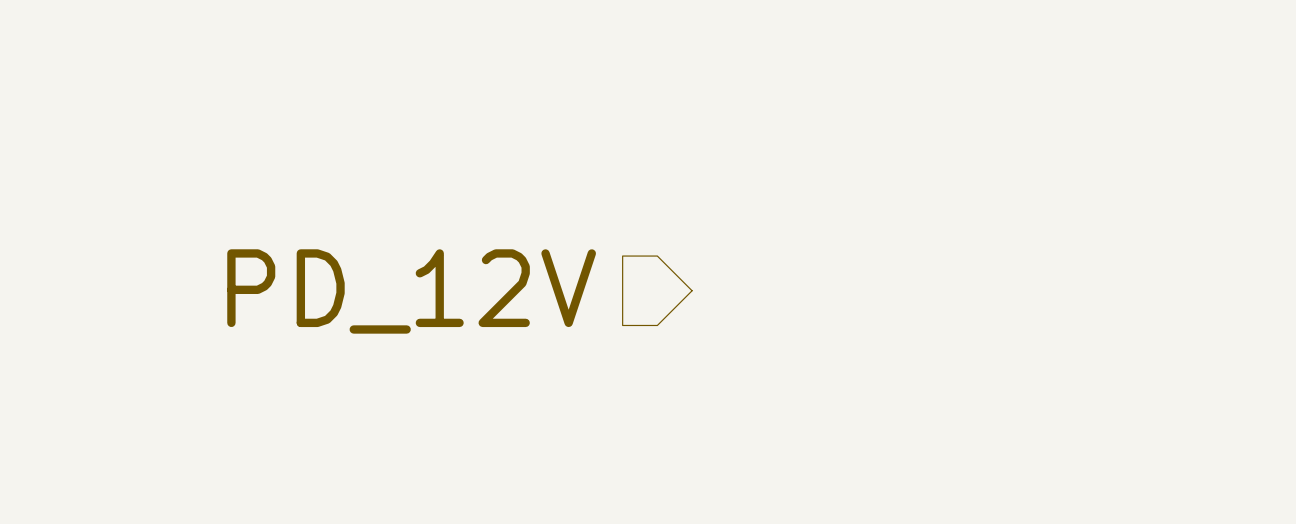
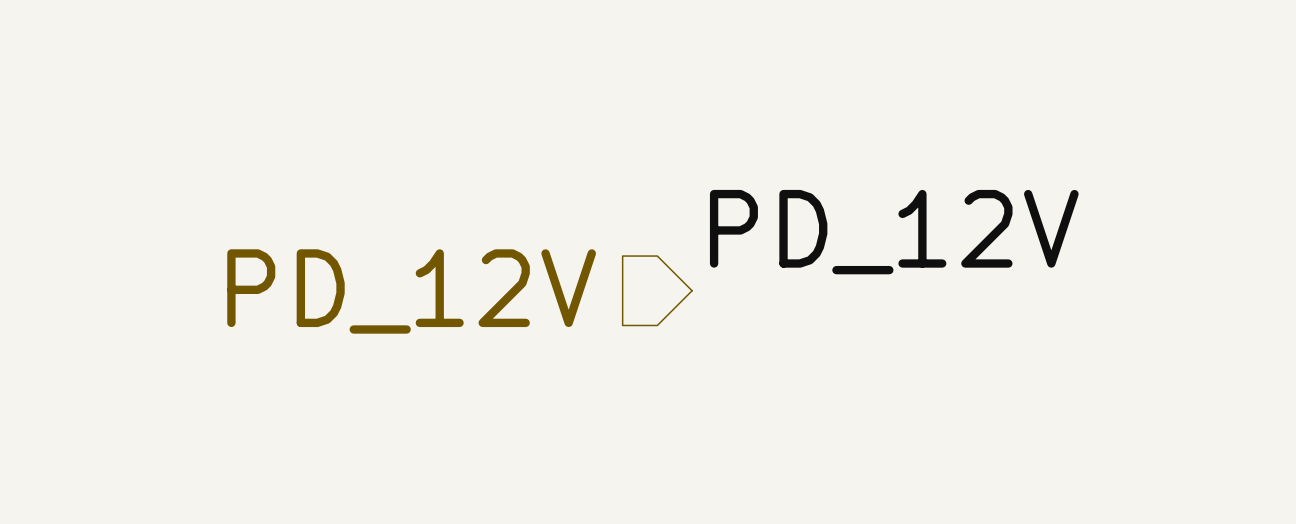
label: none -> PD_12V (894, 232)

